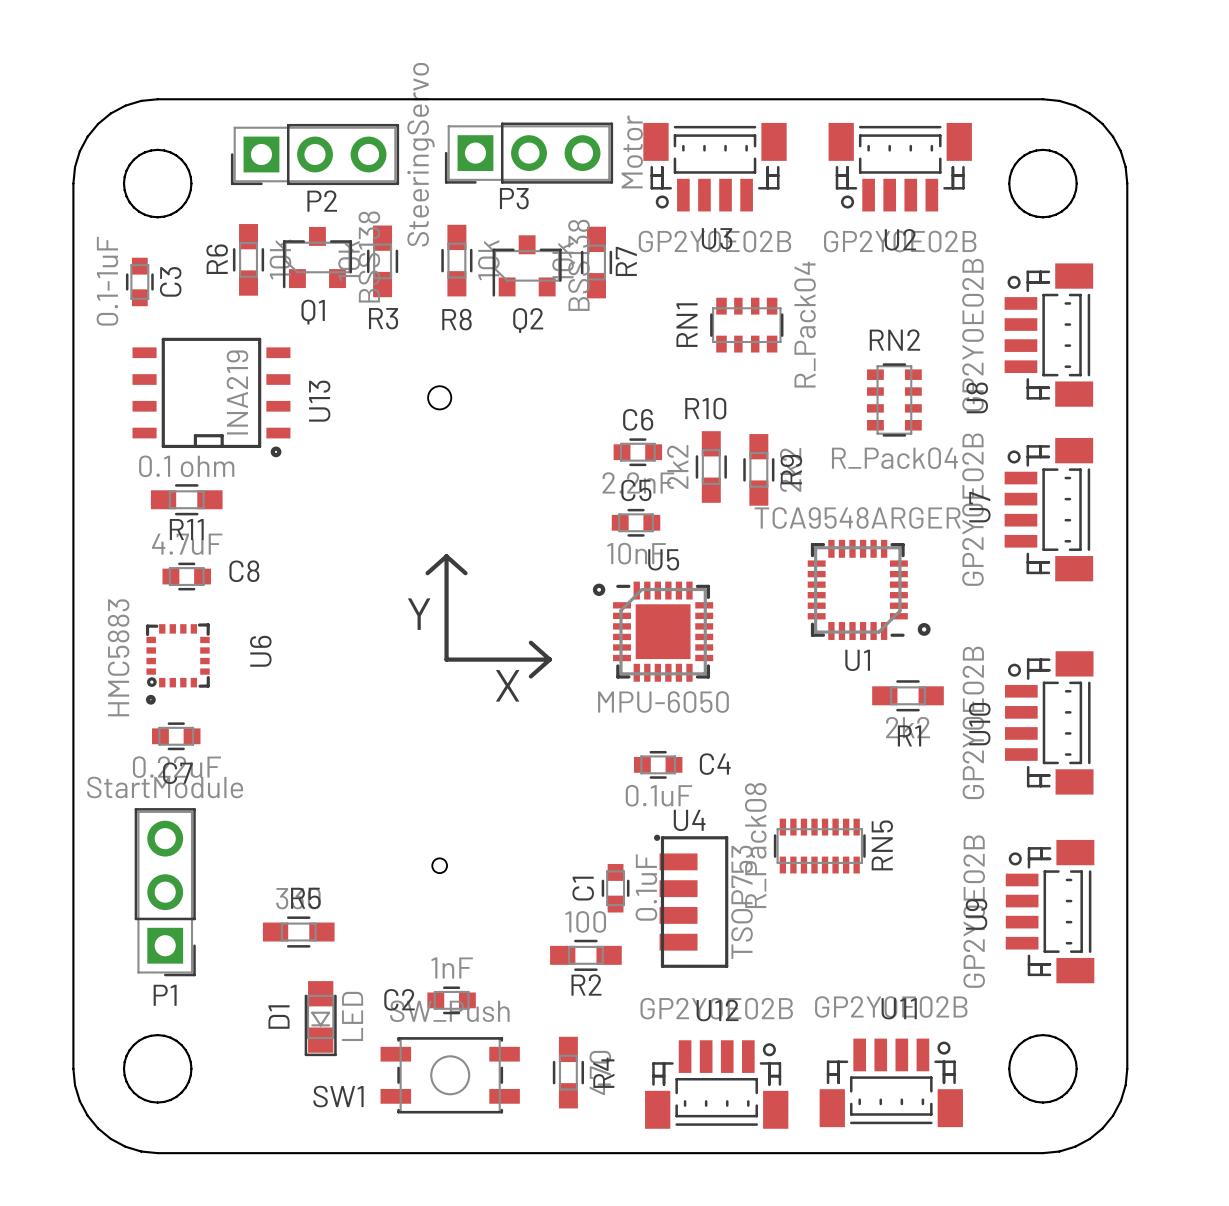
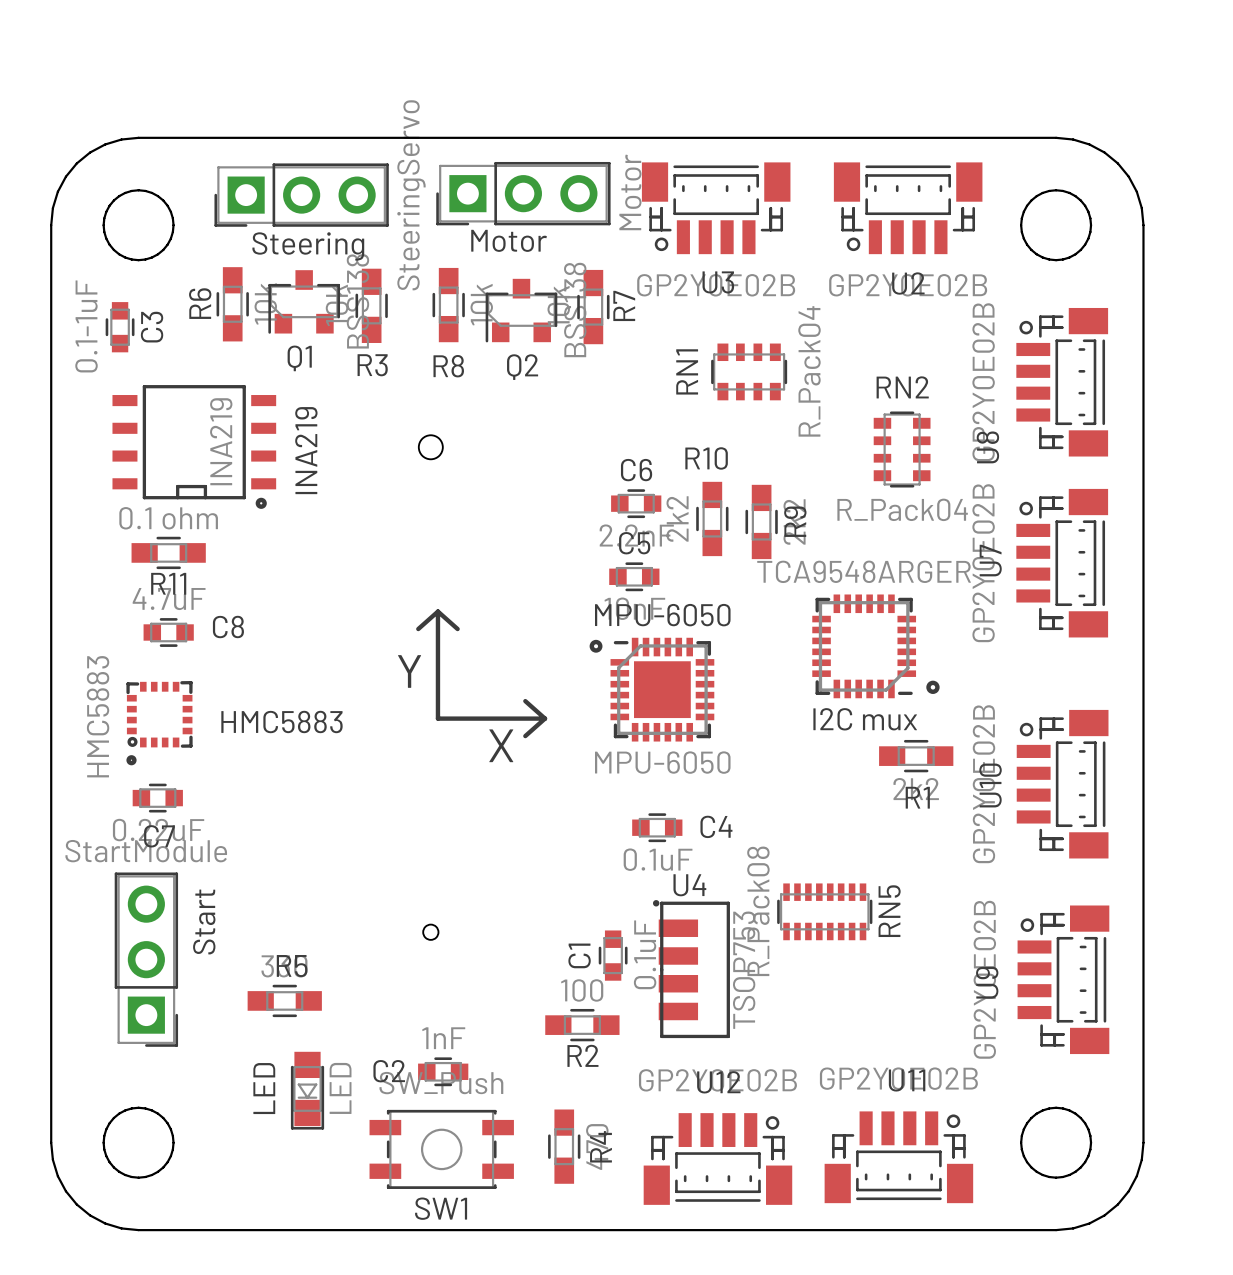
P3 name: P3 (514, 198) -> Motor (509, 240)
P2 name: P2 (322, 201) -> Steering (308, 246)
U13 name: U13 (319, 401) -> INA219 (306, 450)
U5 name: U5 (663, 559) -> MPU-6050 (662, 615)
U6 name: U6 (260, 651) -> HMC5883 (281, 722)
U1 name: U1 (857, 660) -> I2C mux (865, 719)
P1 name: P1 (165, 995) -> Start (204, 922)
D1 name: D1 (279, 1017) -> LED (264, 1088)
SW1 name position: SW1 (338, 1096) -> SW1 (441, 1208)

